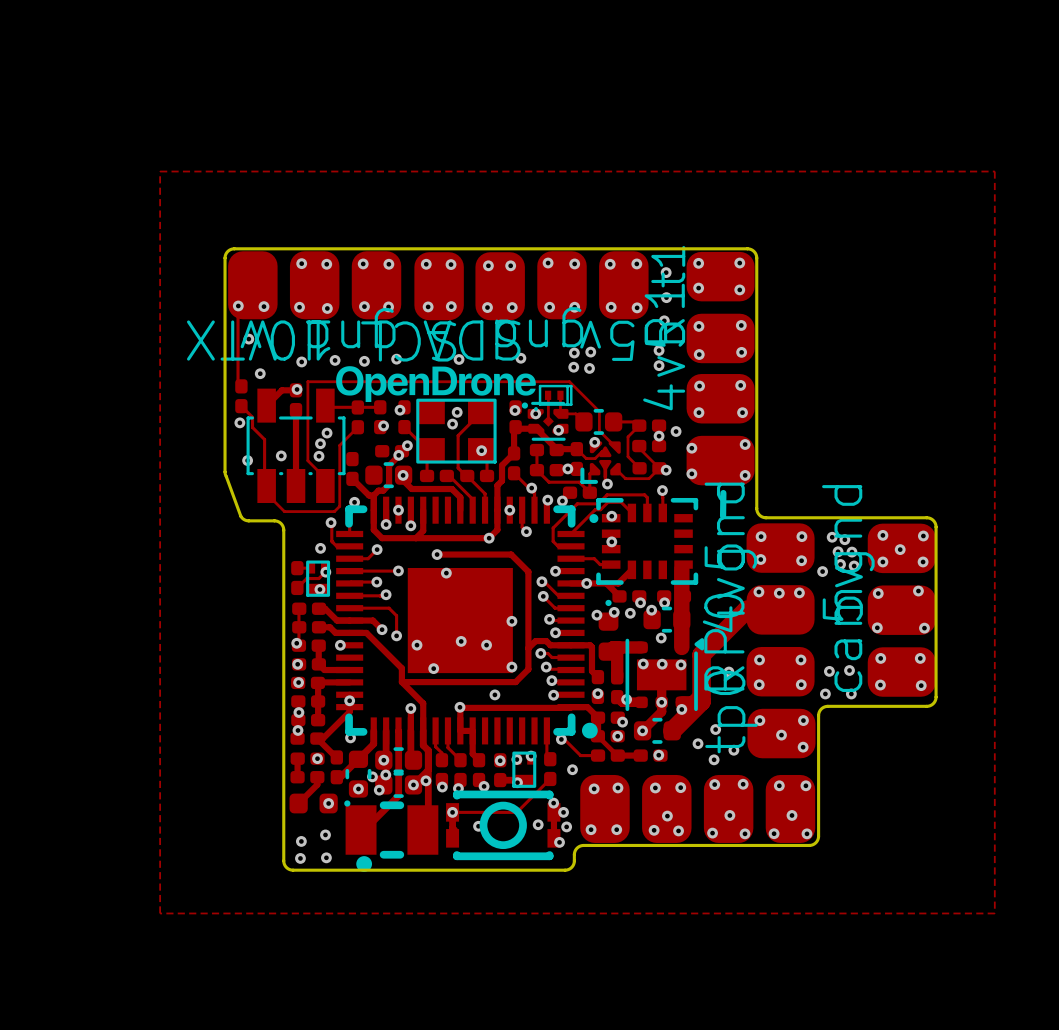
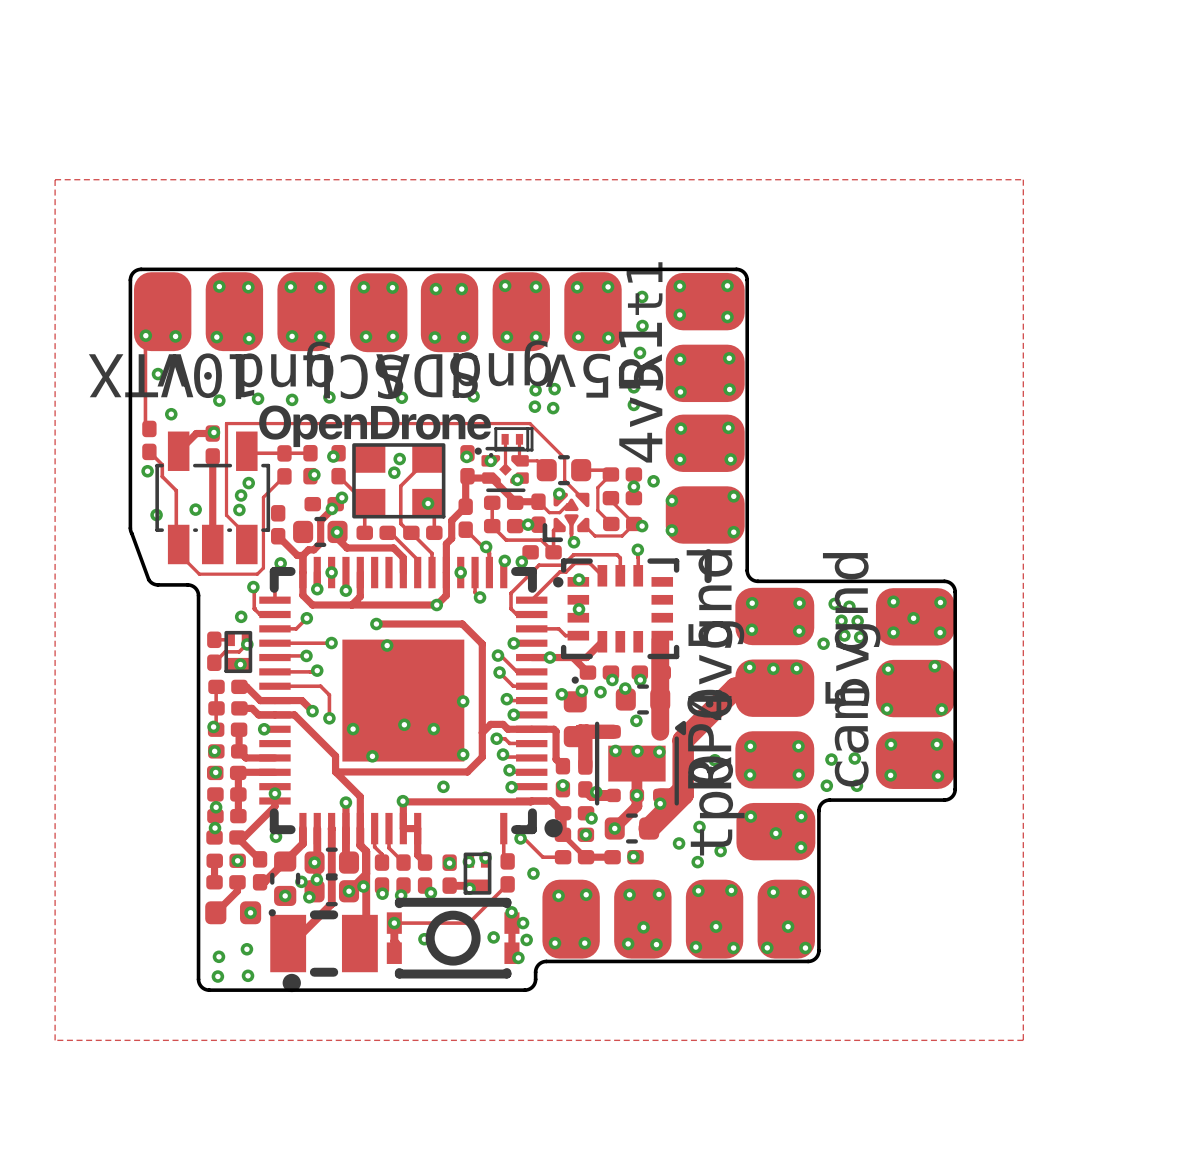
part footprint: [336, 496, 598, 745] -> [259, 556, 563, 845]

